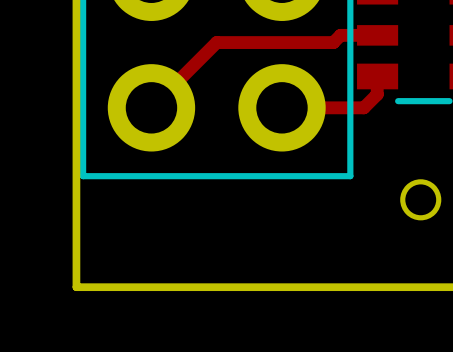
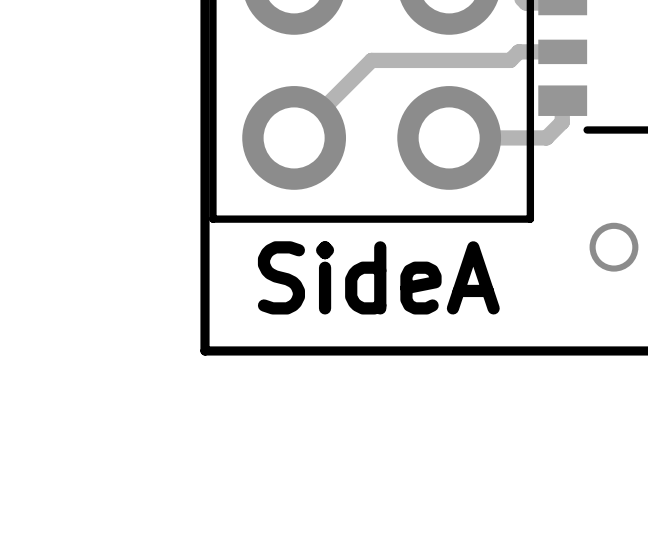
part value: none -> SideA (378, 277)

